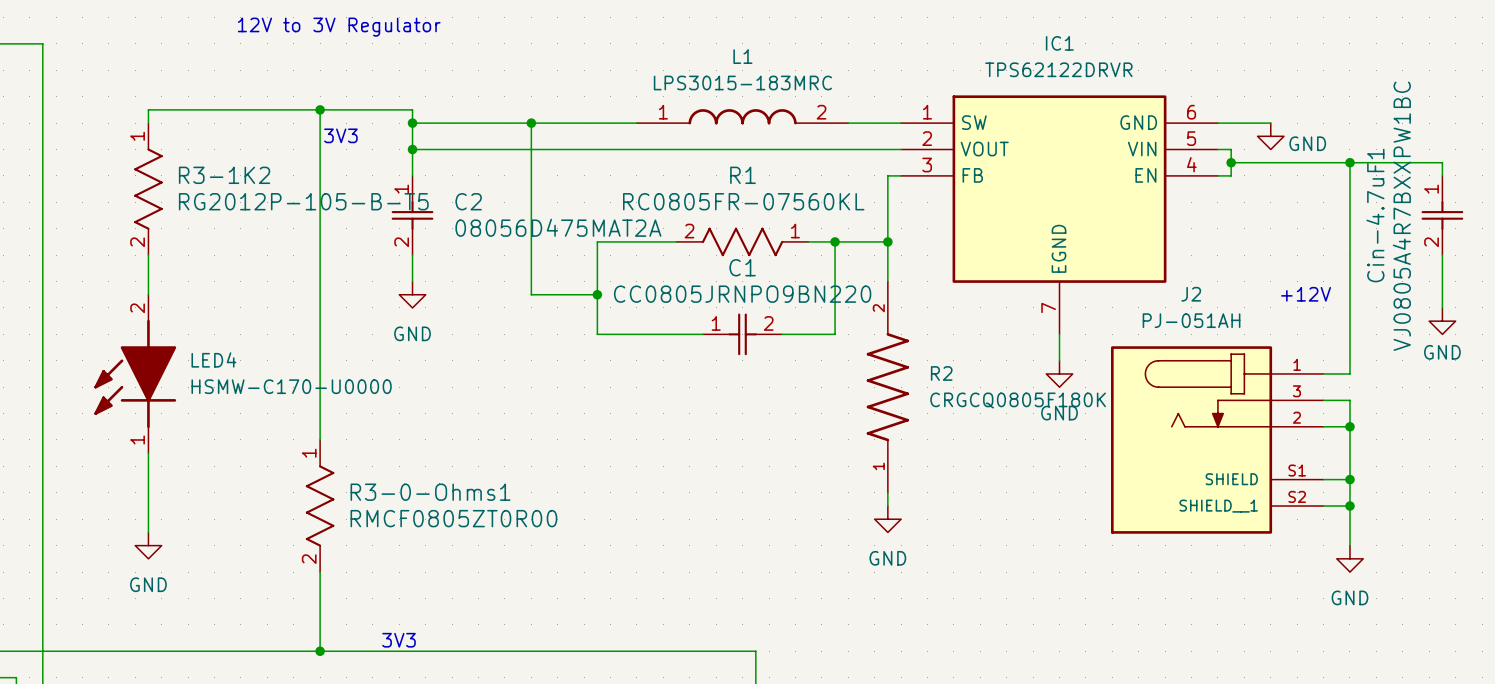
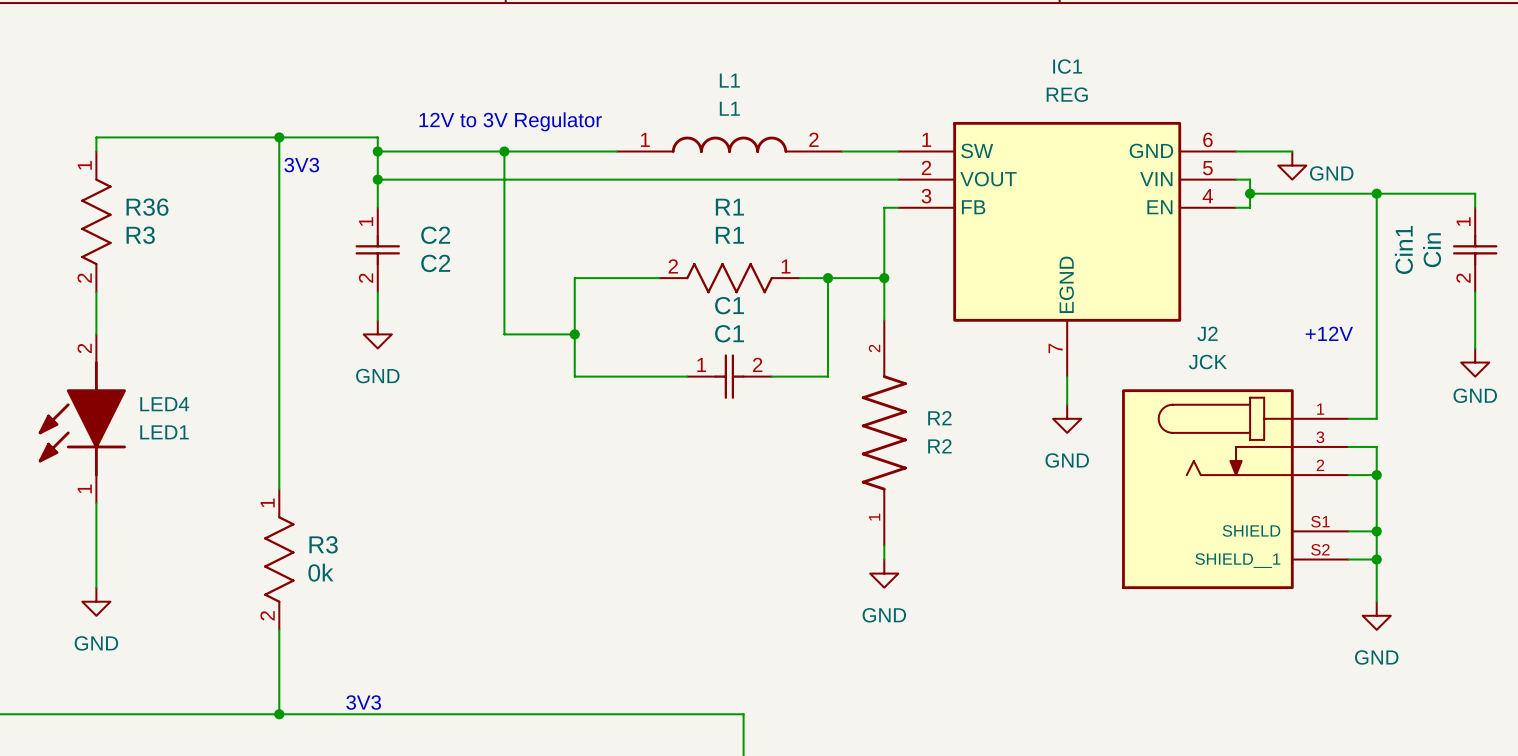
text position: 12V to 3V Regulator (339, 27) -> 12V to 3V Regulator (510, 121)
IC1 value: TPS62122DRVR (1058, 69) -> REG (1067, 94)
L1 value: LPS3015-183MRC (742, 82) -> L1 (729, 108)
R3-1K2 name: R3-1K2 (224, 175) -> R36 (147, 207)
R3-1K2 value: RG2012P-105-B-T5 (303, 201) -> R3 (140, 235)
R1 value: RC0805FR-07560KL (743, 201) -> R1 (729, 235)
Cin-4.7uF1 name: Cin-4.7uF1 (1375, 215) -> Cin1 (1403, 249)
Cin-4.7uF1 value: VJ0805A4R7BXXPW1BC (1401, 216) -> Cin (1432, 250)
C2 value: 08056D475MAT2A (558, 227) -> C2 (435, 263)
C1 value: CC0805JRNPO9BN220 (742, 294) -> C1 (729, 333)
J2 value: PJ-051AH (1191, 320) -> JCK (1207, 362)
LED4 value: HSMW-C170-U0000 (291, 386) -> LED1 (164, 432)
R2 value: CRGCQ0805F180K (1018, 400) -> R2 (939, 446)
R3-0-Ohms1 name: R3-0-Ohms1 (430, 492) -> R3 (323, 544)
R3-0-Ohms1 value: RMCF0805ZT0R00 (453, 518) -> 0k (320, 572)

